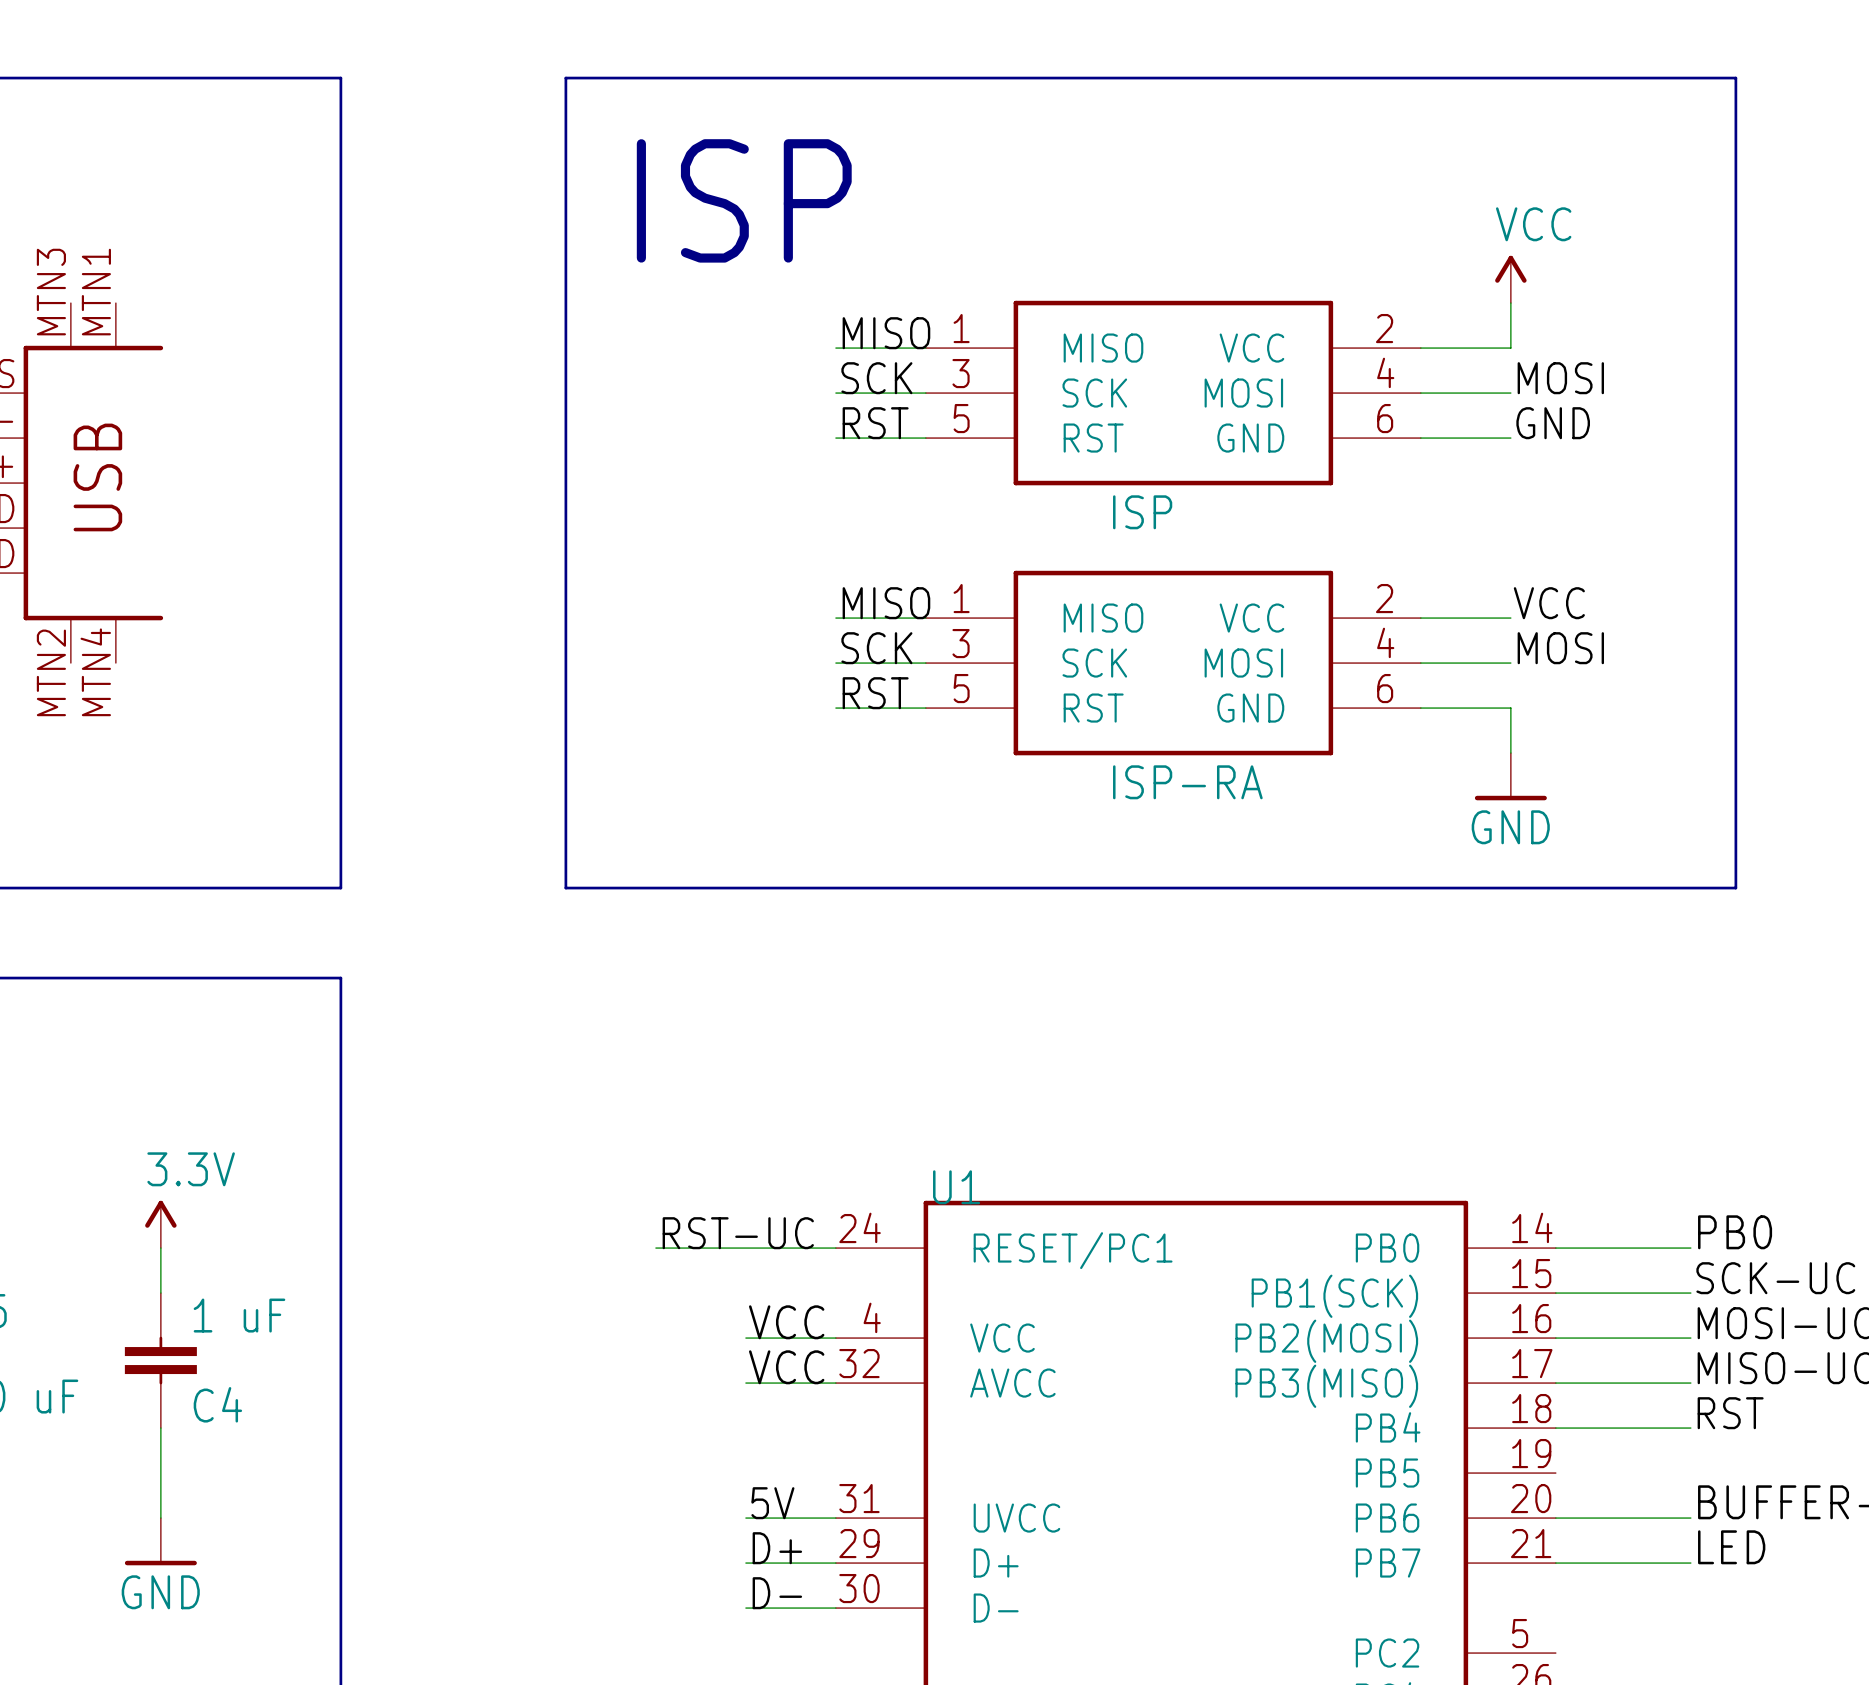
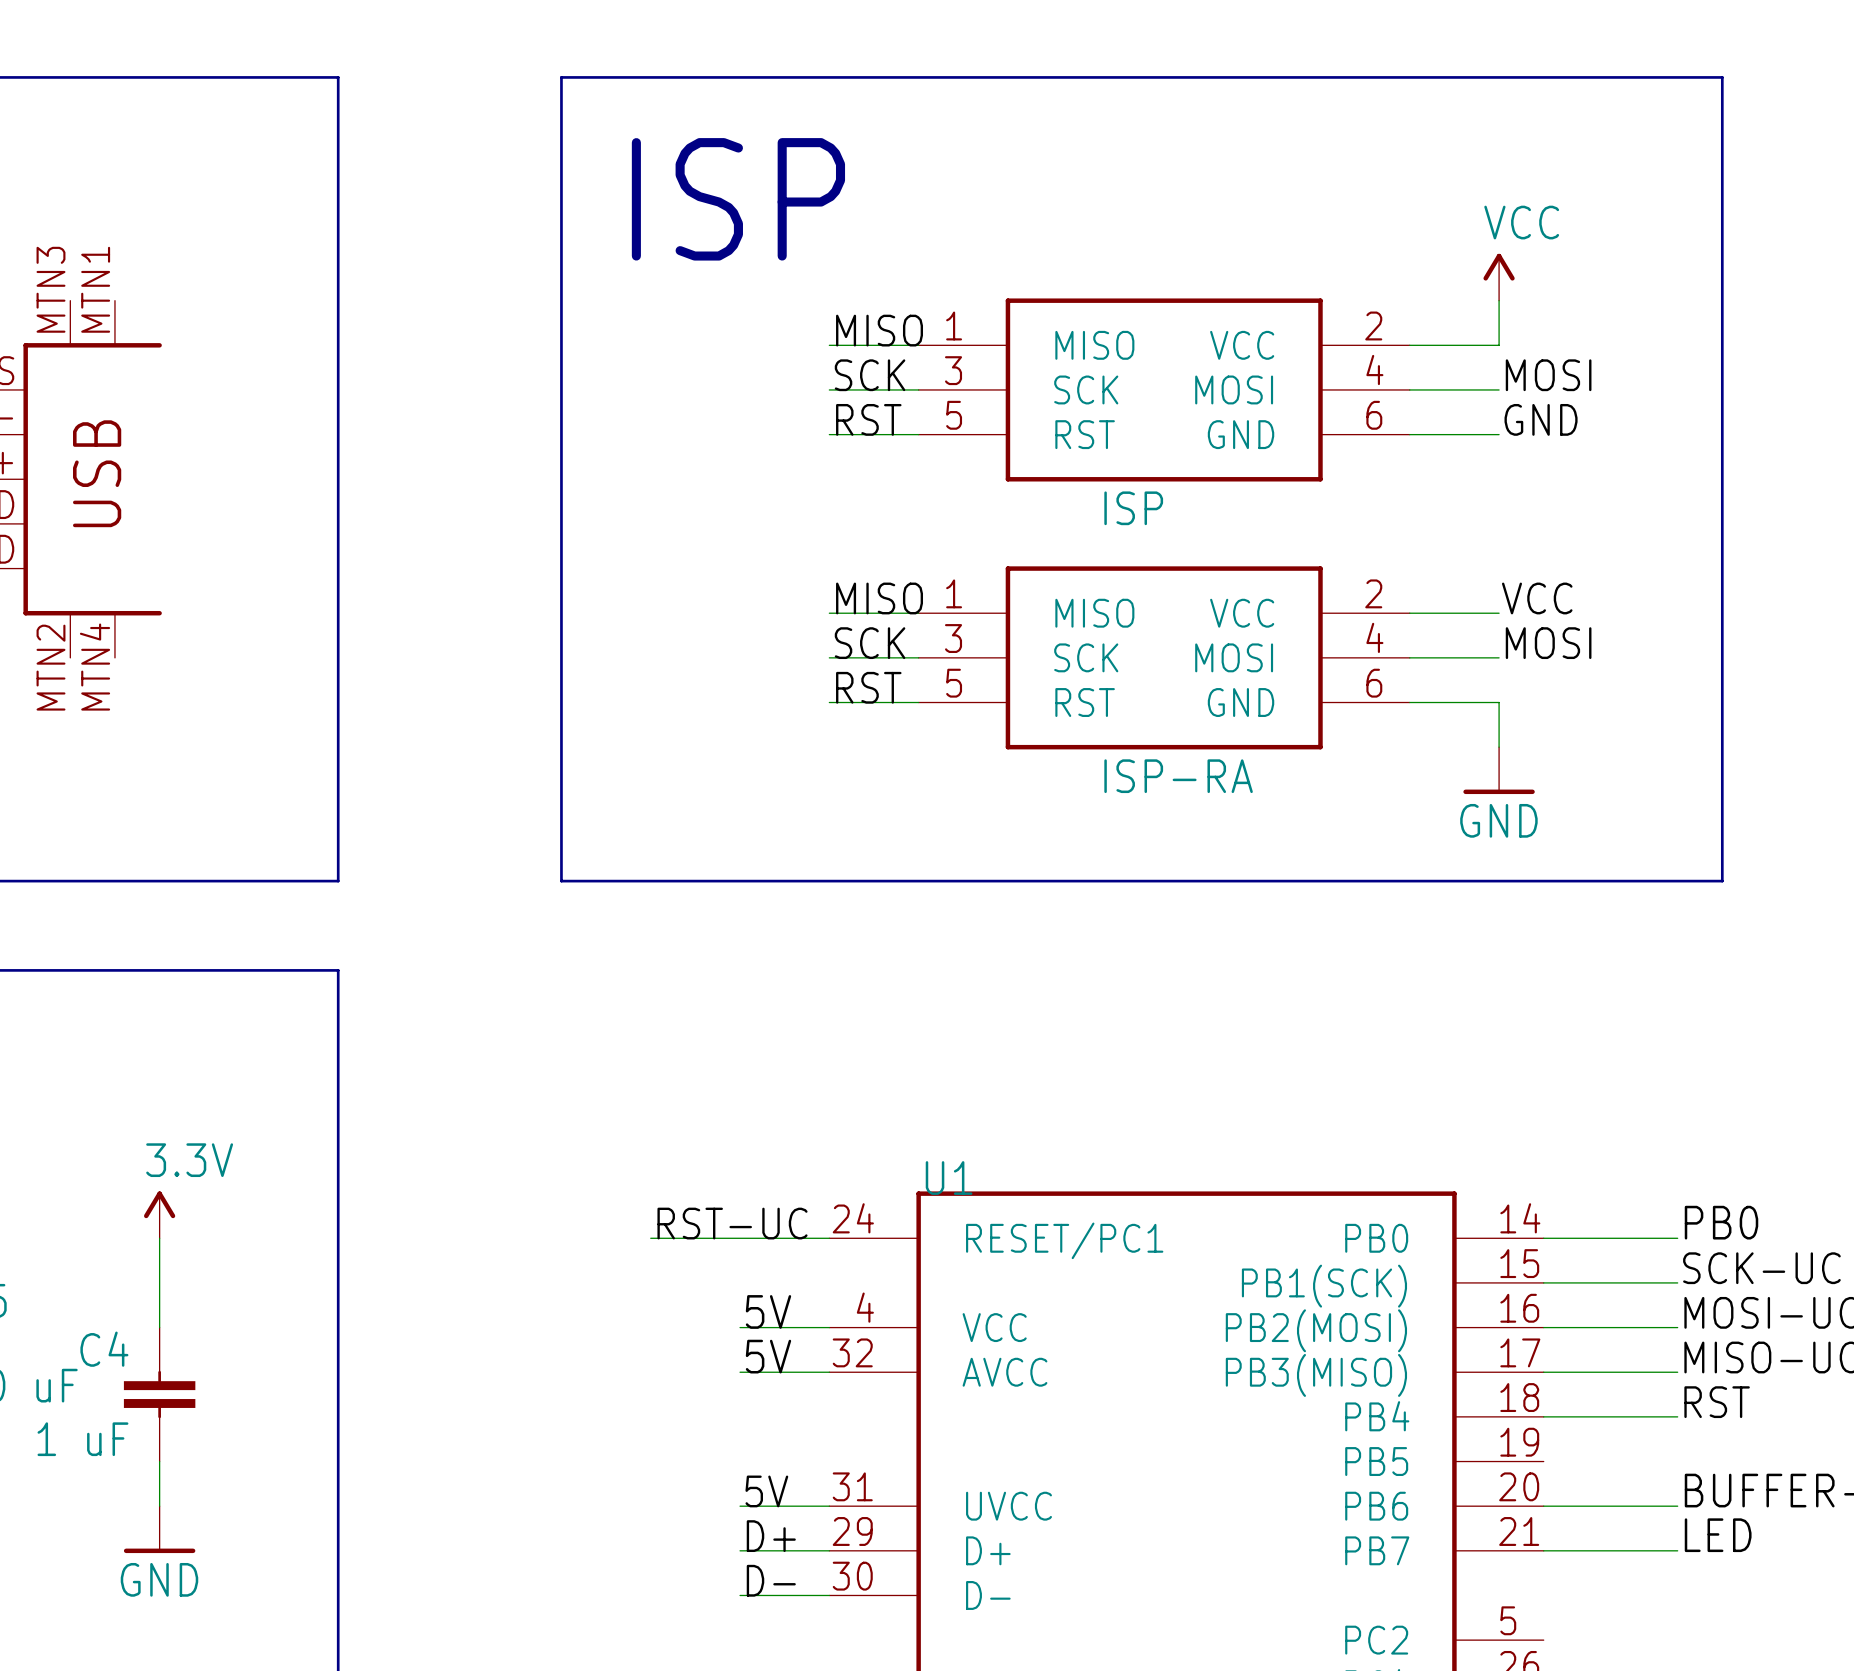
C4 value position: 1 uF (239, 1315) -> 1 uF (82, 1439)
label: VCC (786, 1322) -> 5V (768, 1311)
C4 position: (160, 1360) -> (159, 1394)
label: VCC (786, 1367) -> 5V (768, 1356)
C4 name position: C4 (217, 1404) -> C4 (104, 1349)

